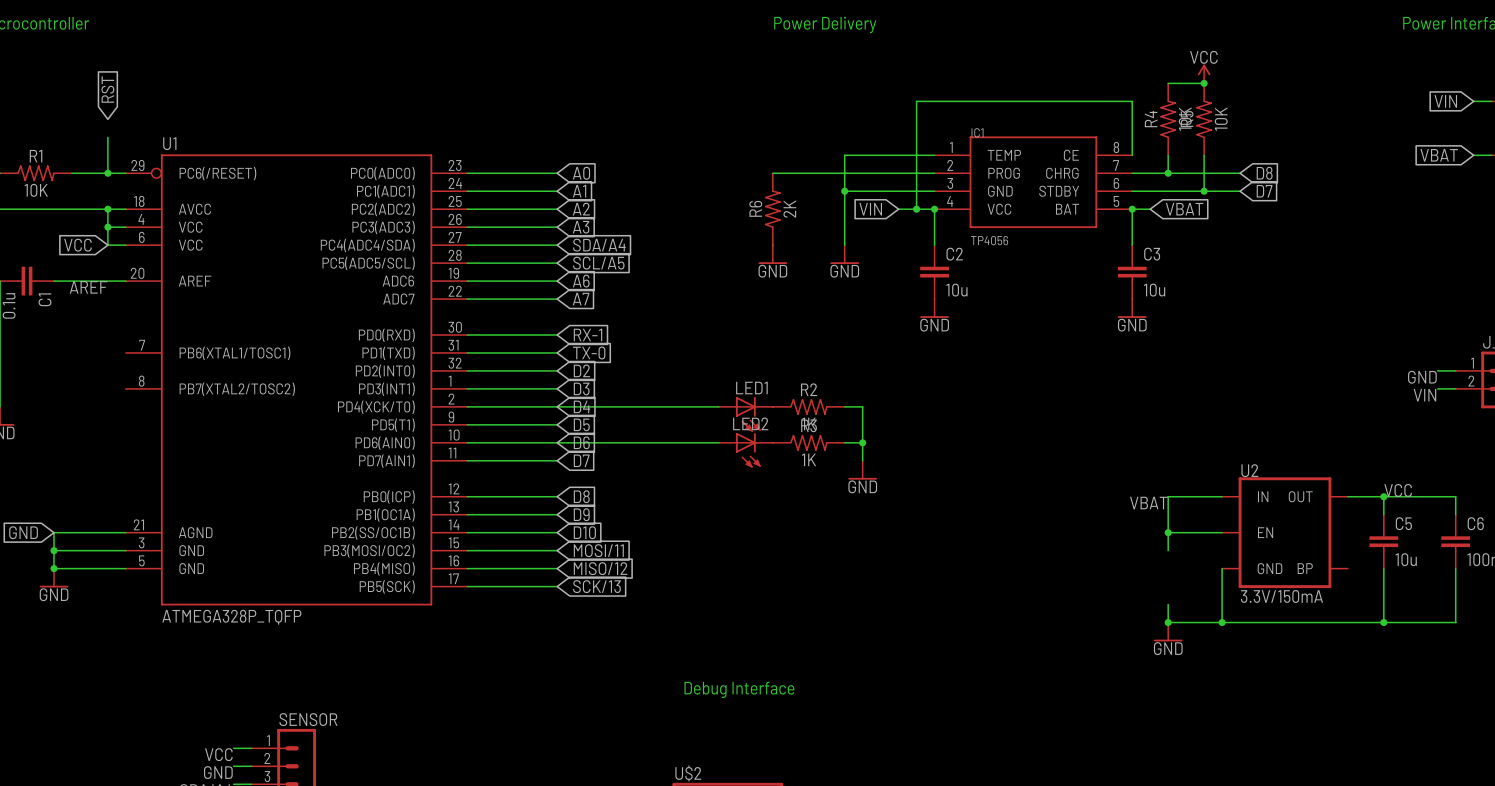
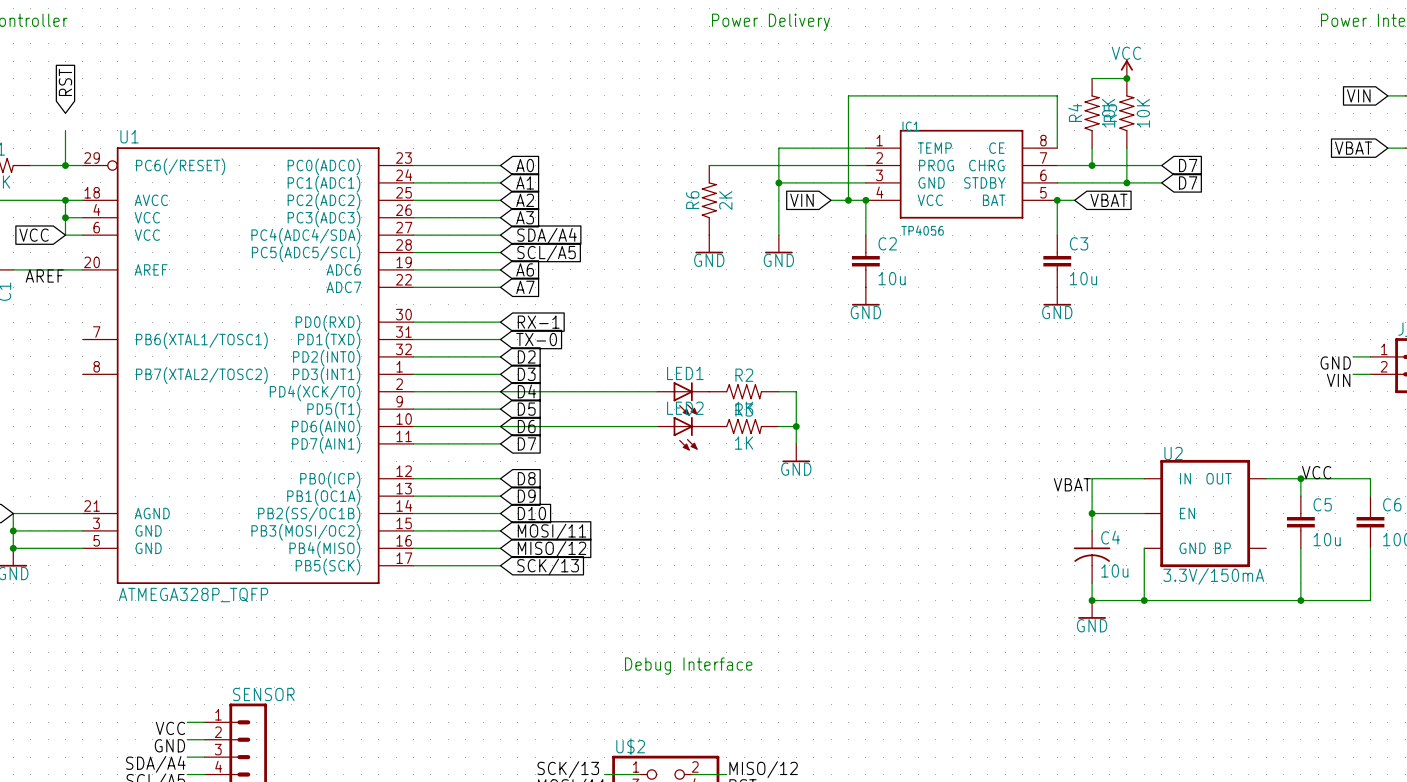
global label: D8 (1264, 173) -> D7 (1188, 165)
C4: none -> 10u (1092, 557)

